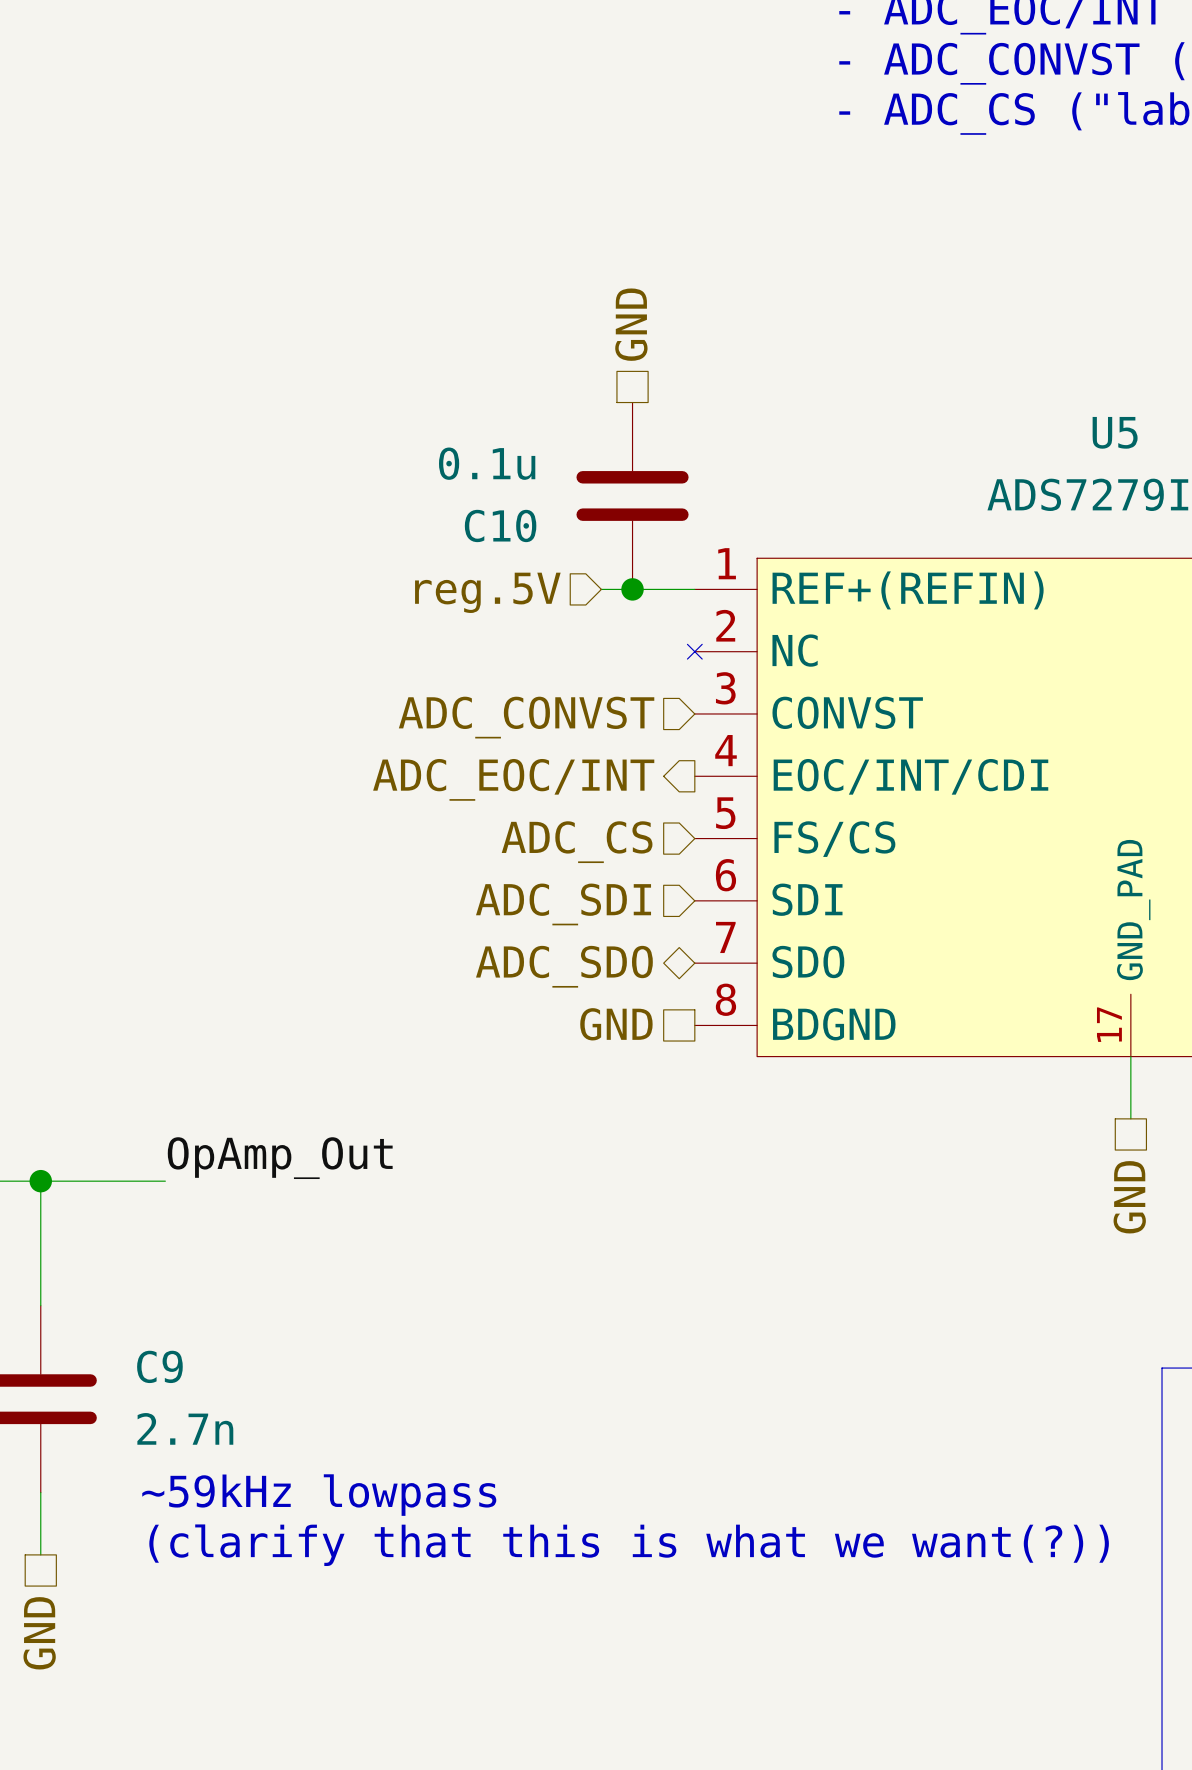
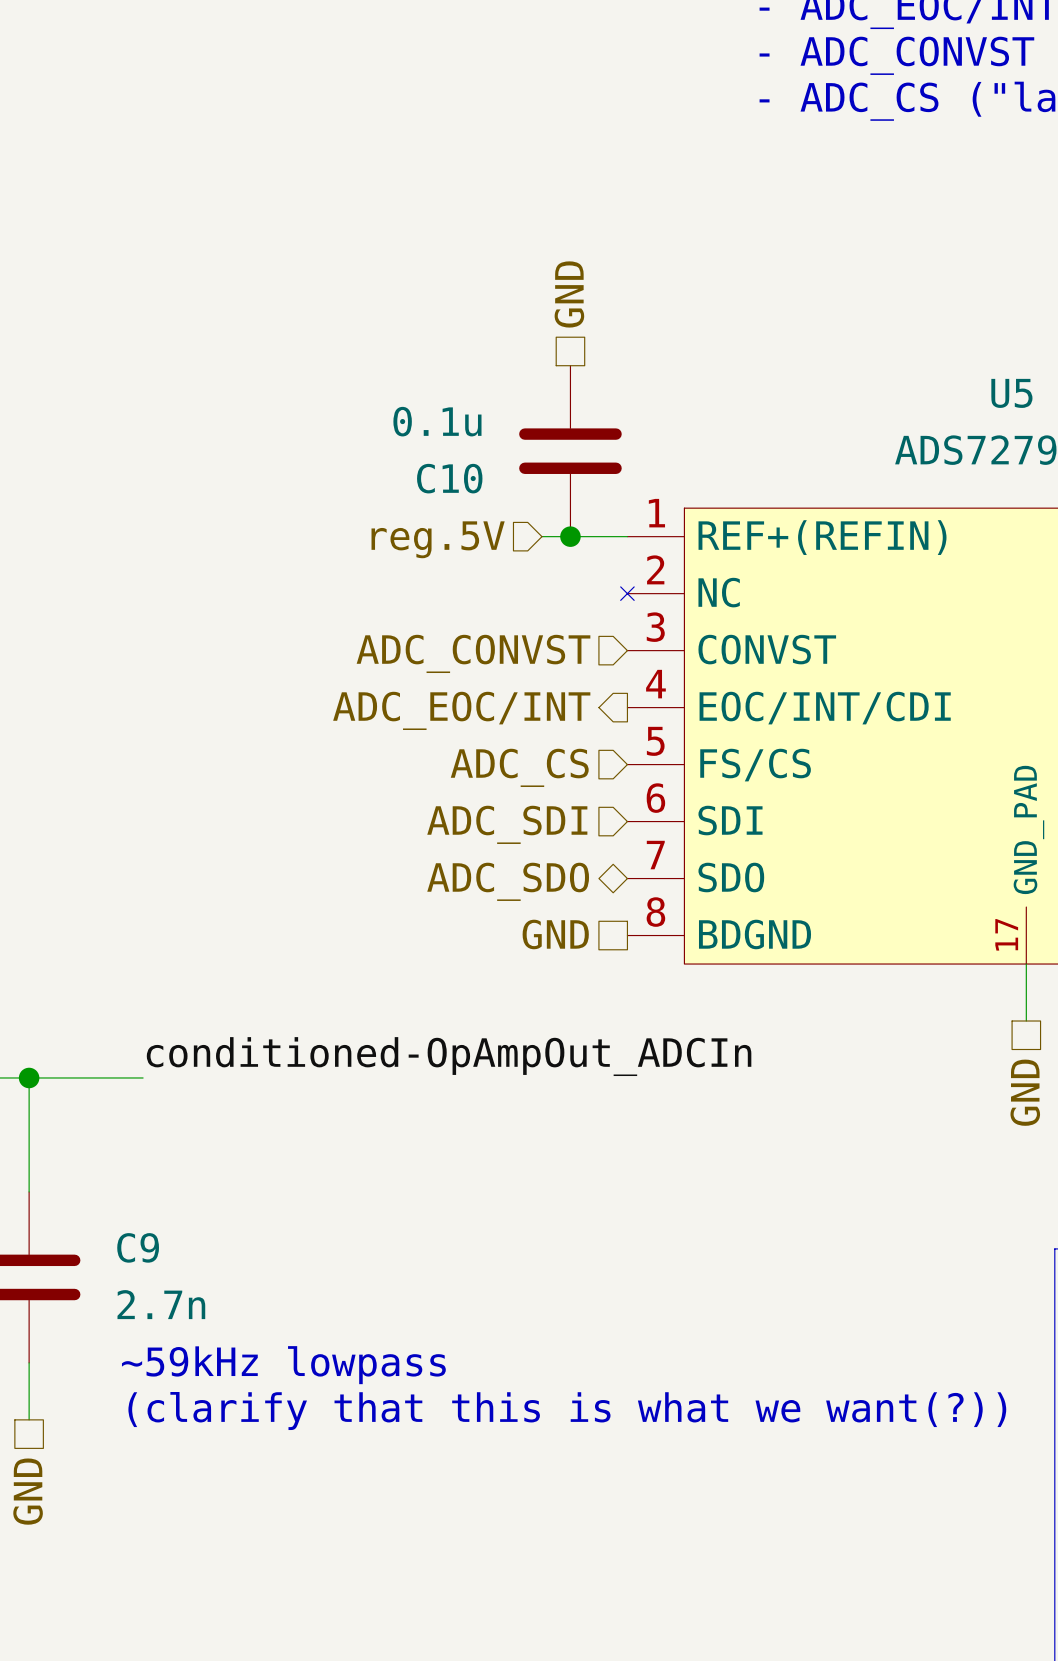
label: OpAmp_Out (280, 1158) -> conditioned-OpAmpOut_ADCIn (449, 1056)

